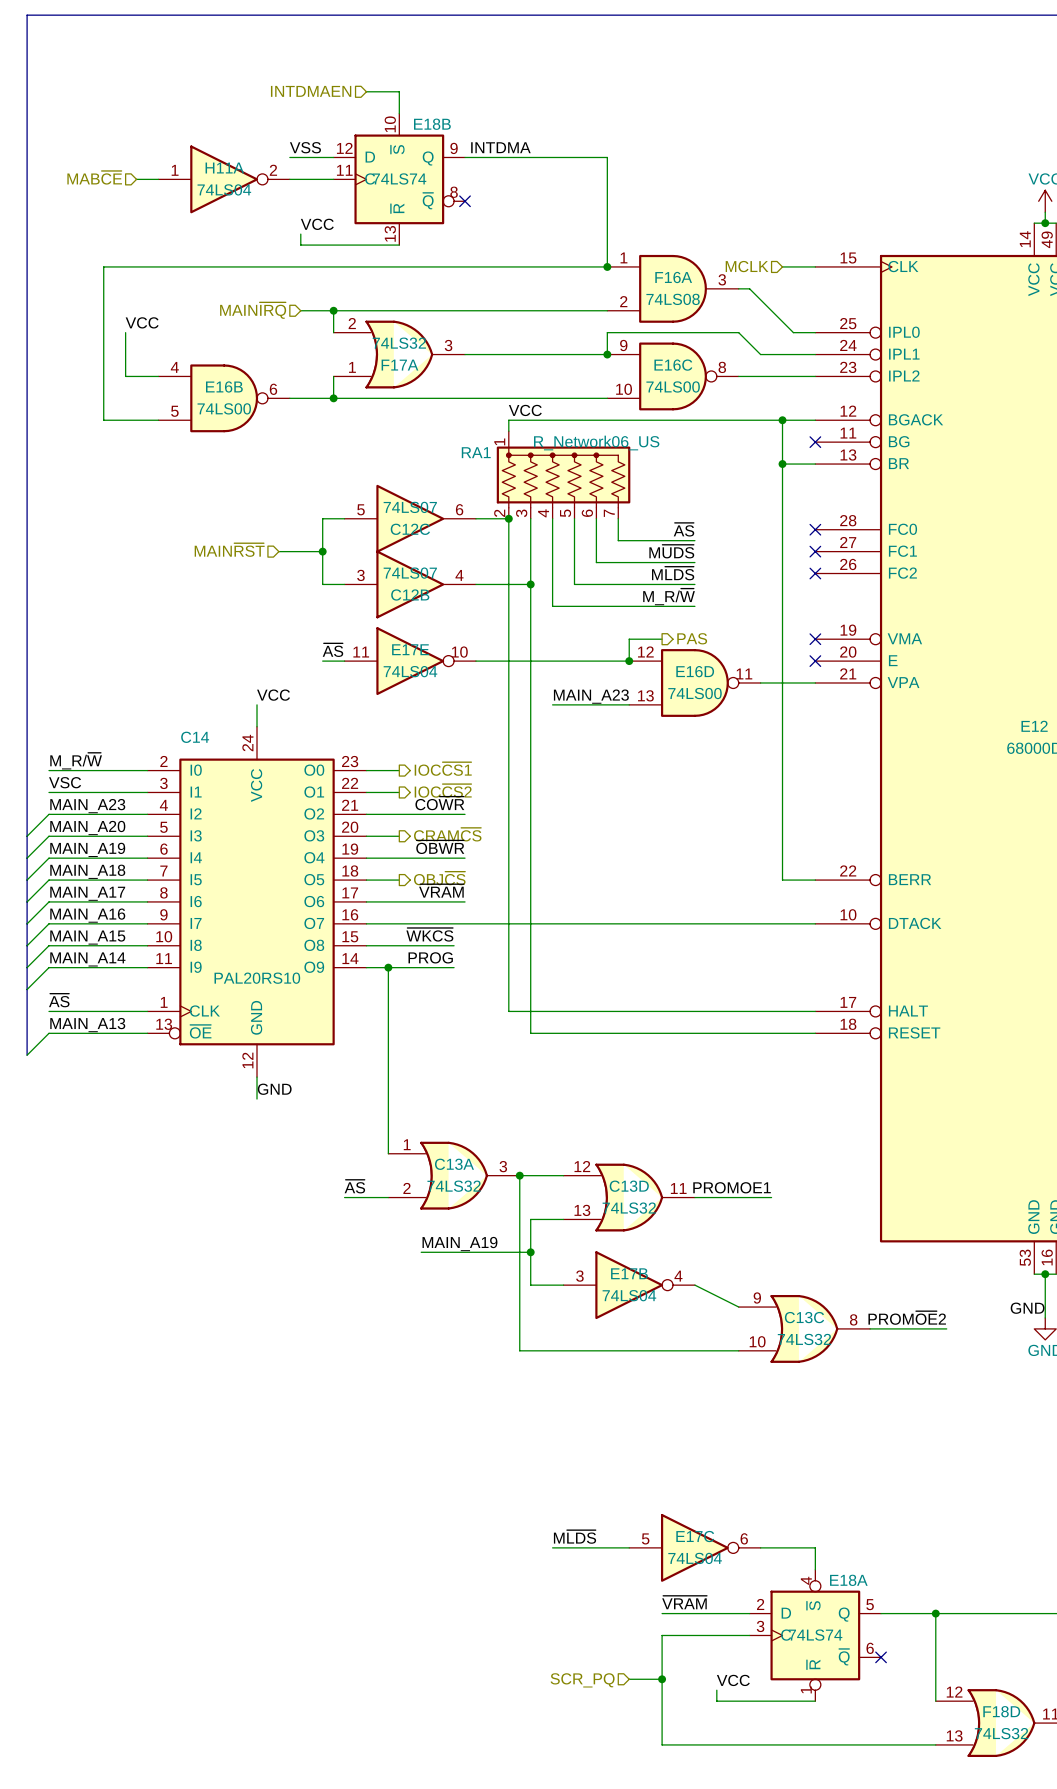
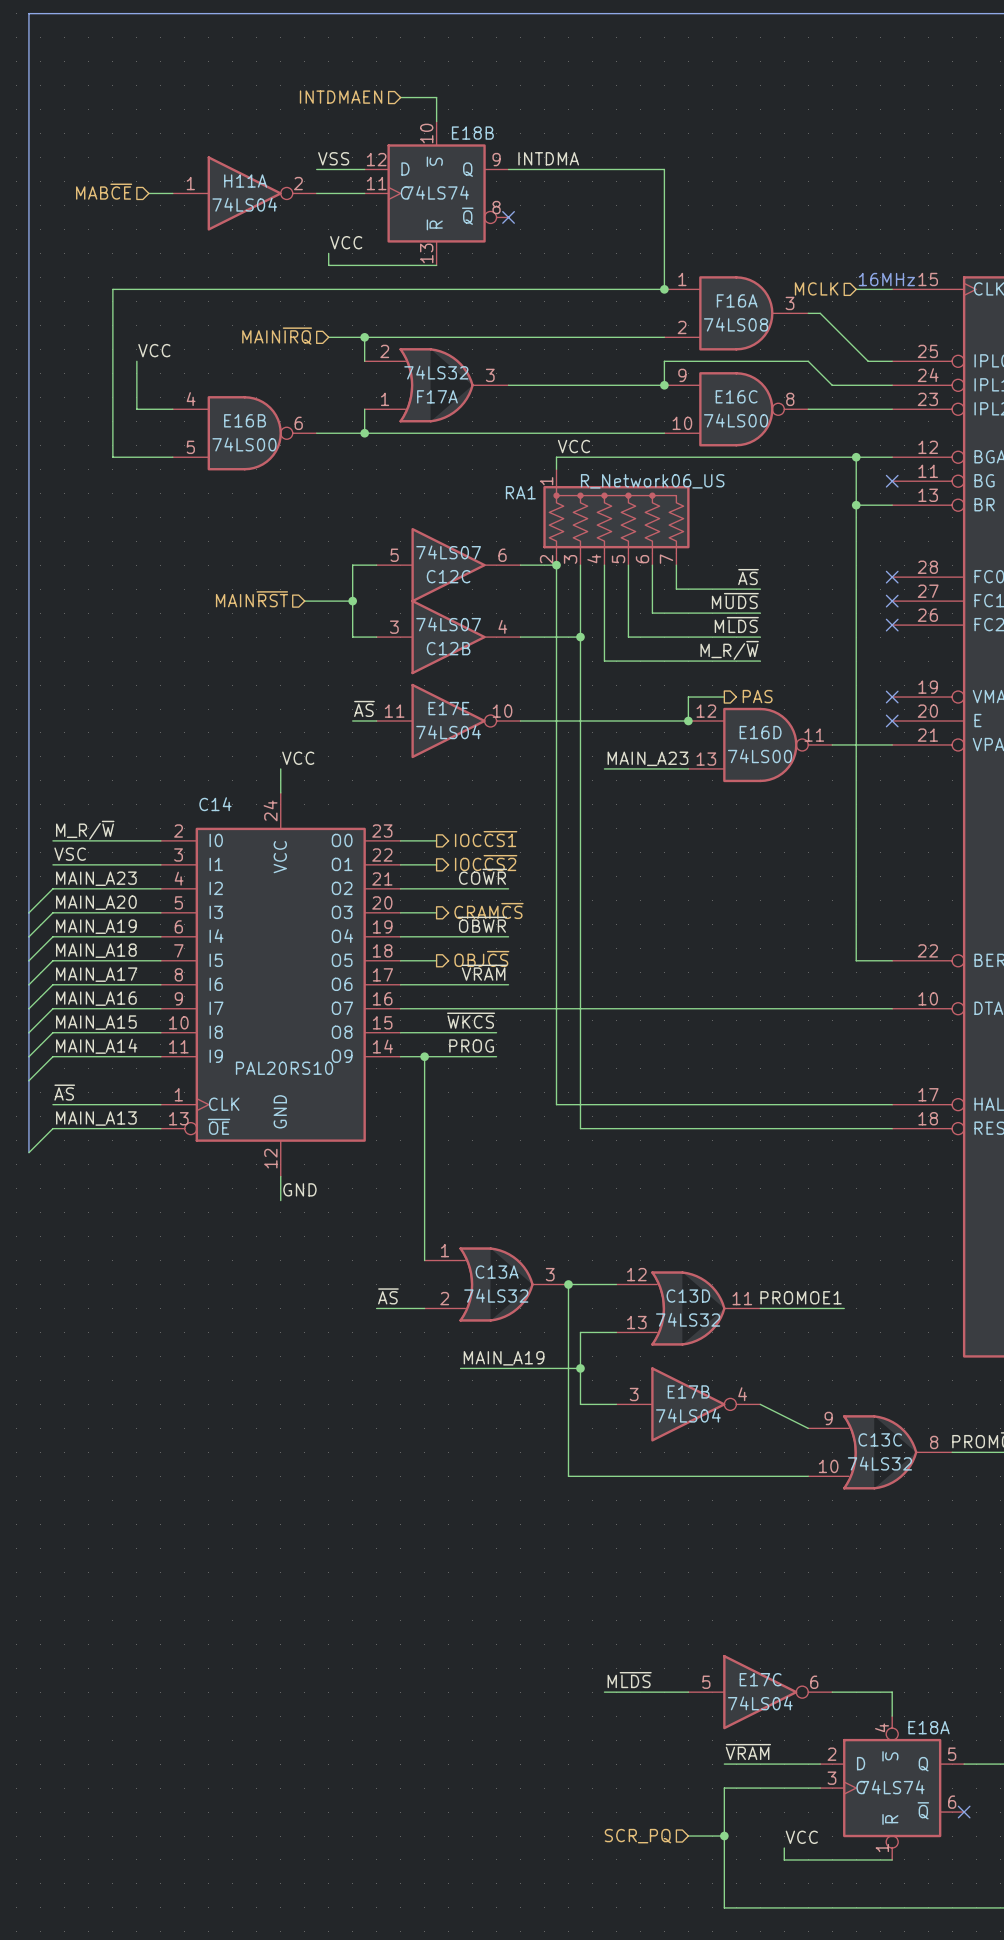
text: none -> 16MHz (886, 279)

